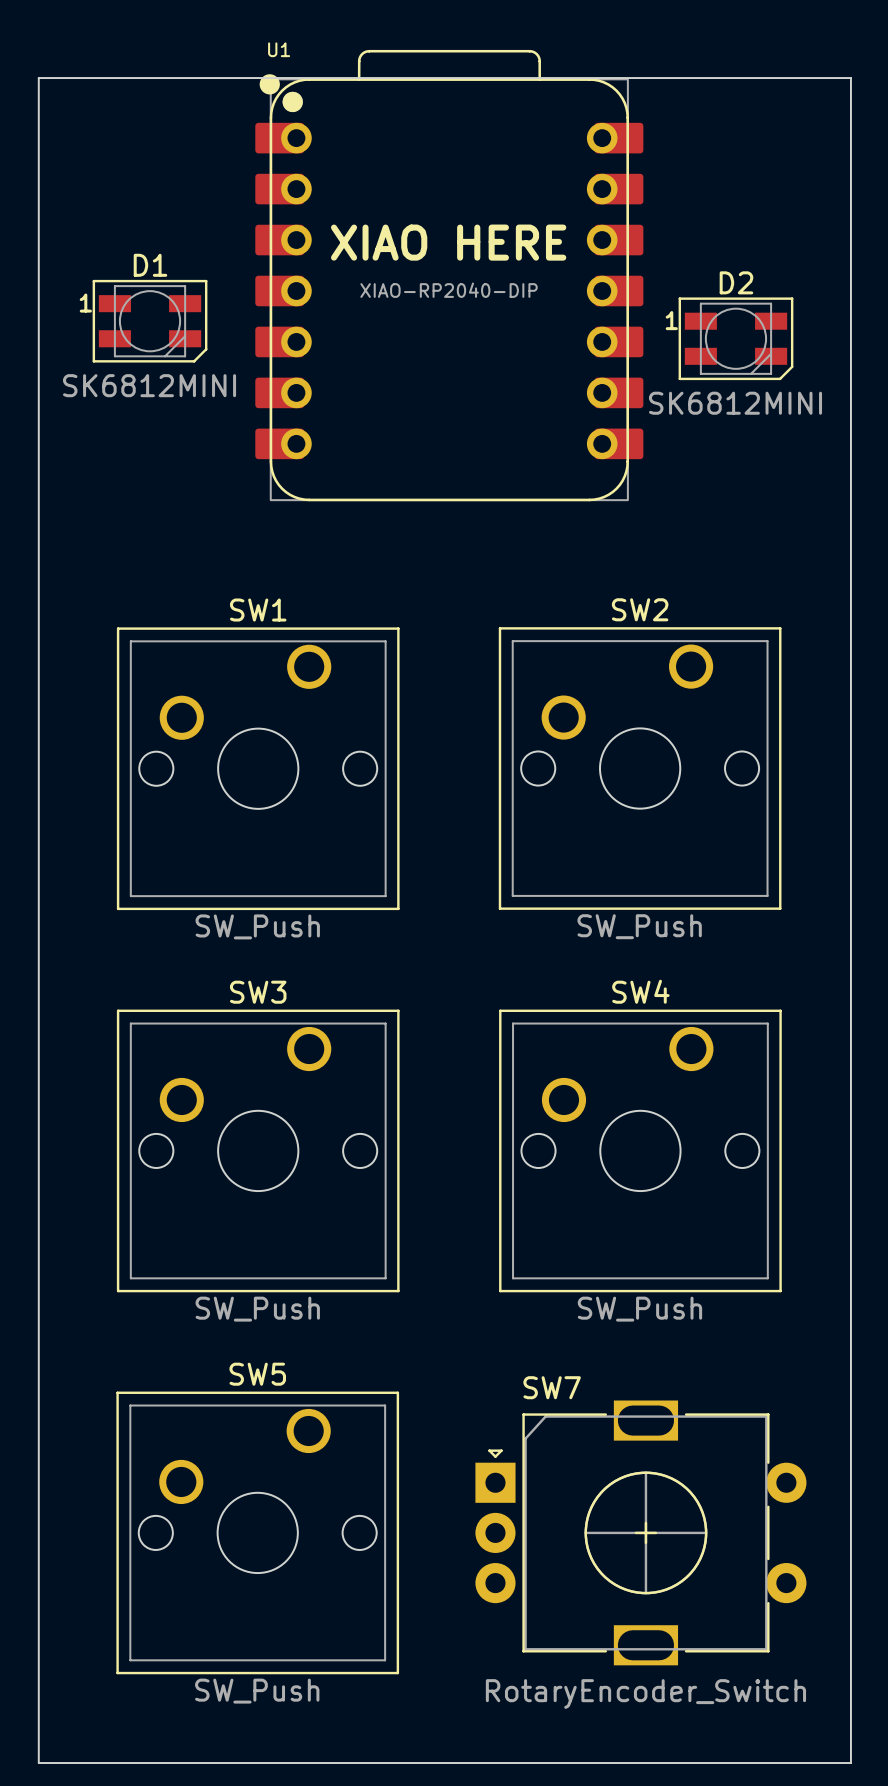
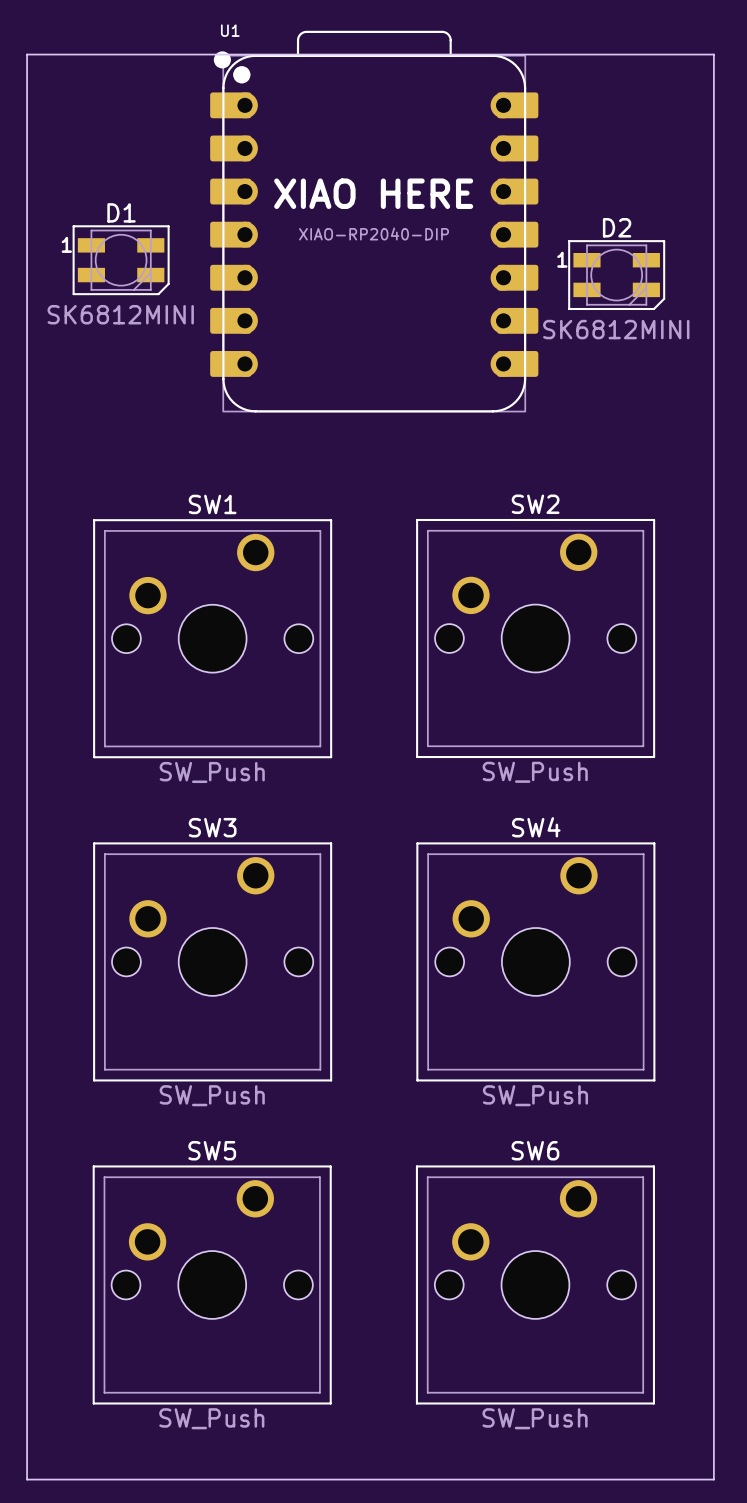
SW6: none -> SW_Push (535, 1284)
SW7: RotaryEncoder_Switch (640, 1532) -> none

